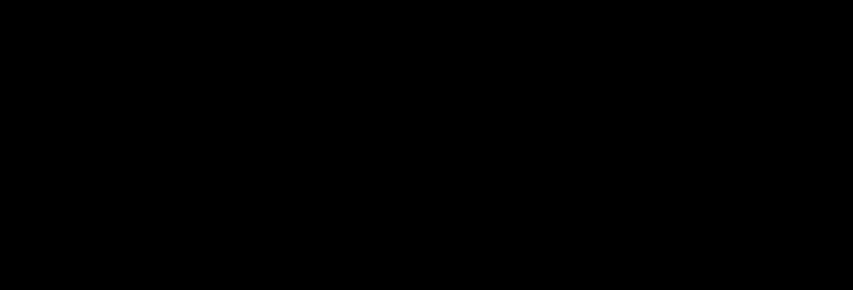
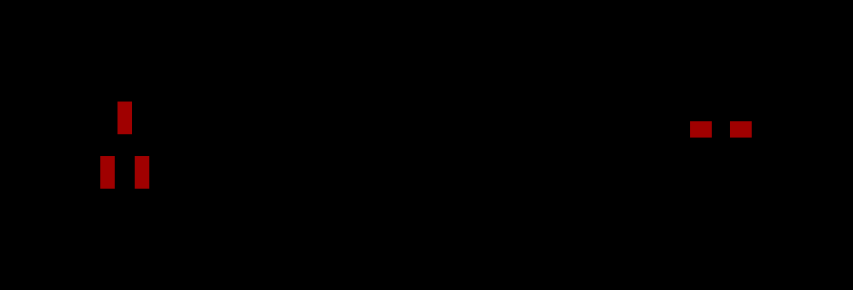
part: none -> (720, 129)
part: none -> (124, 145)

